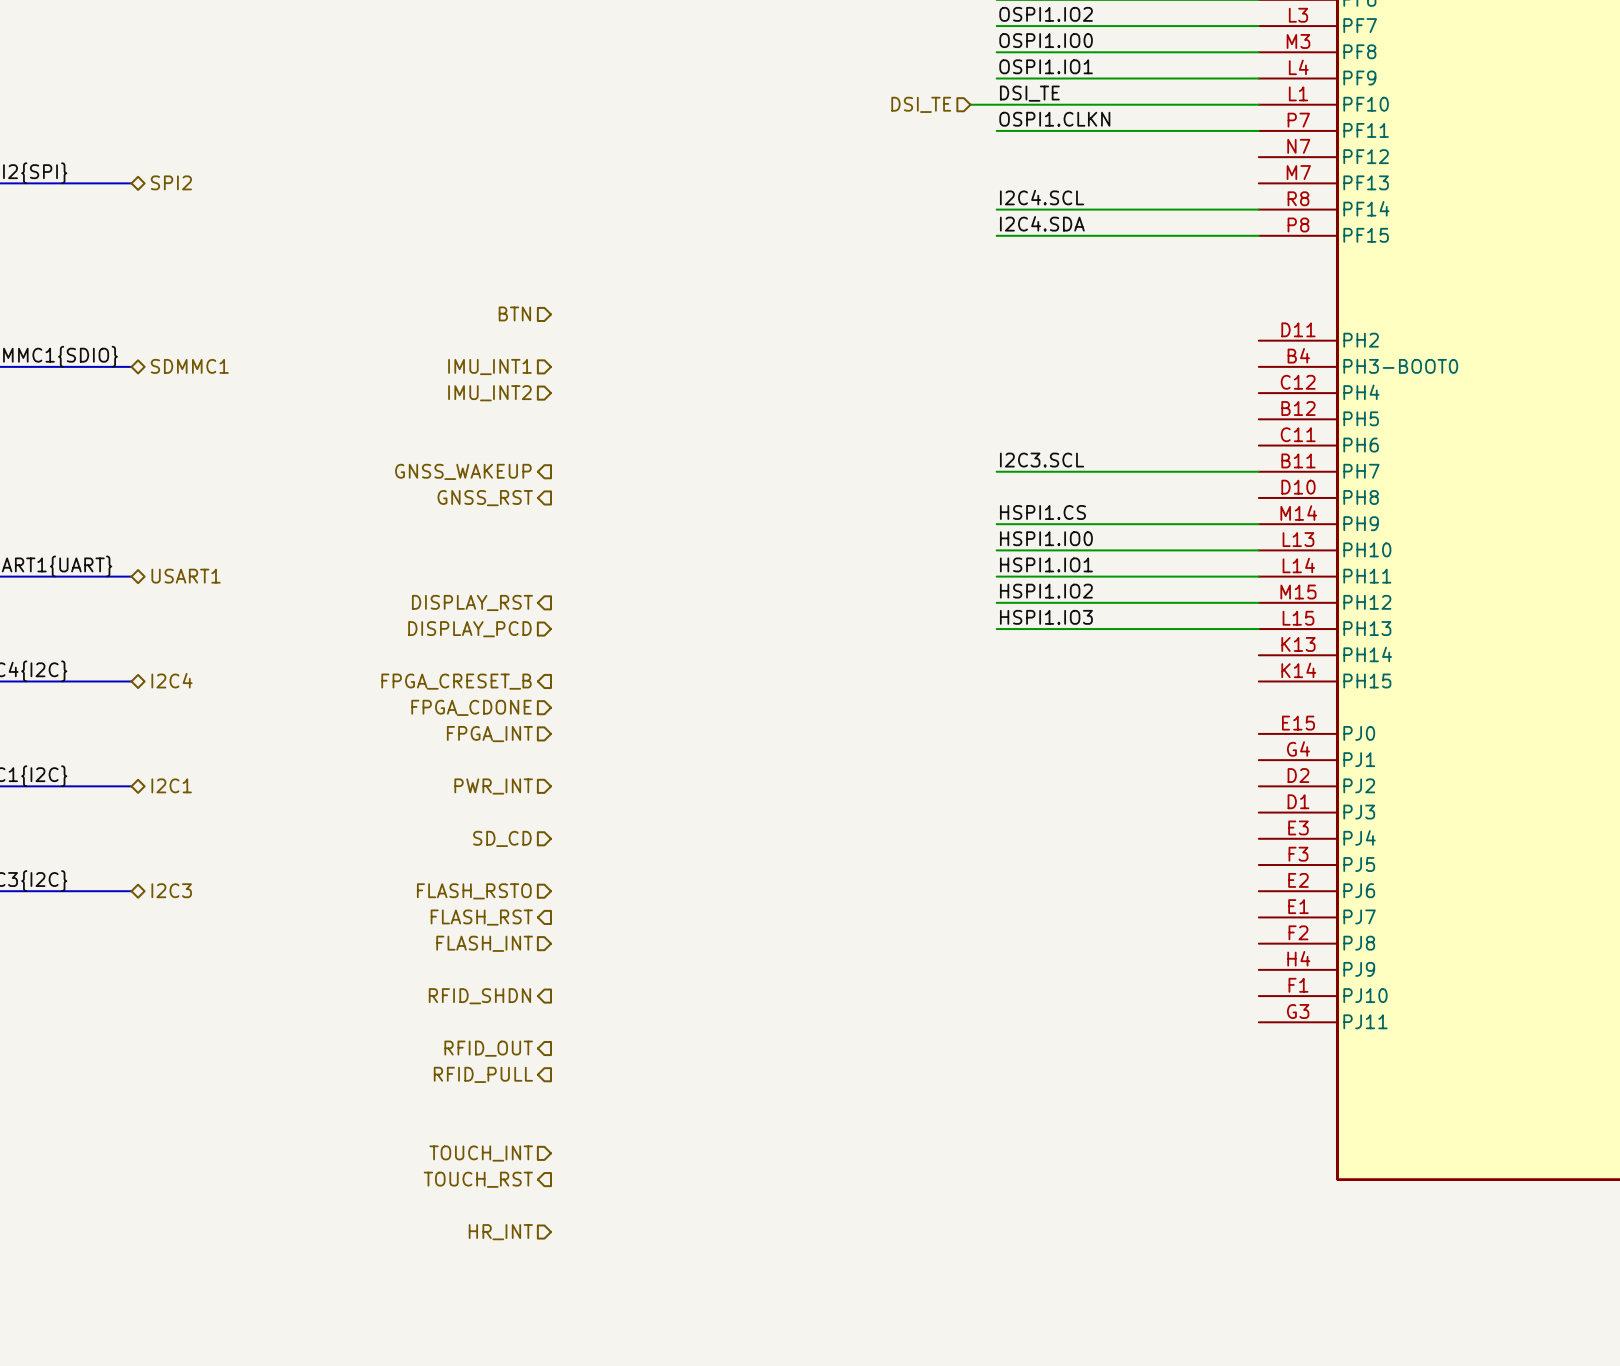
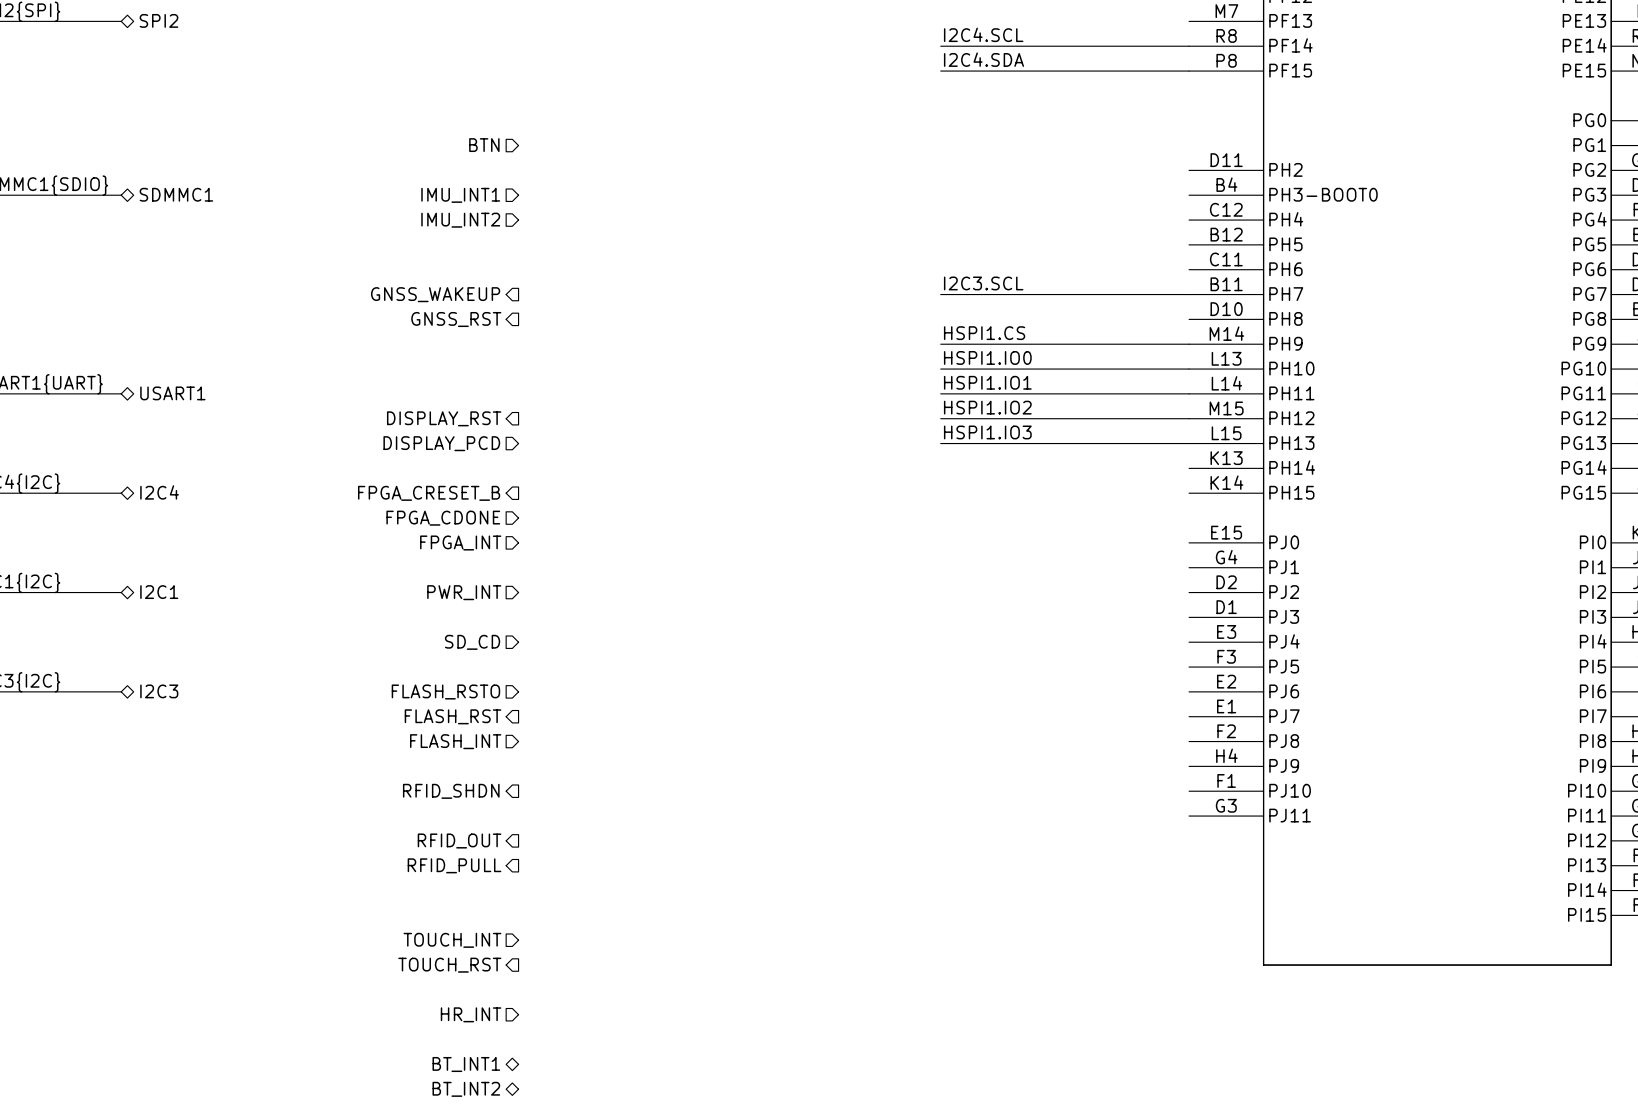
hierarchical label: none -> BT_INT1 (466, 1064)
hierarchical label: none -> BT_INT2 (466, 1089)

